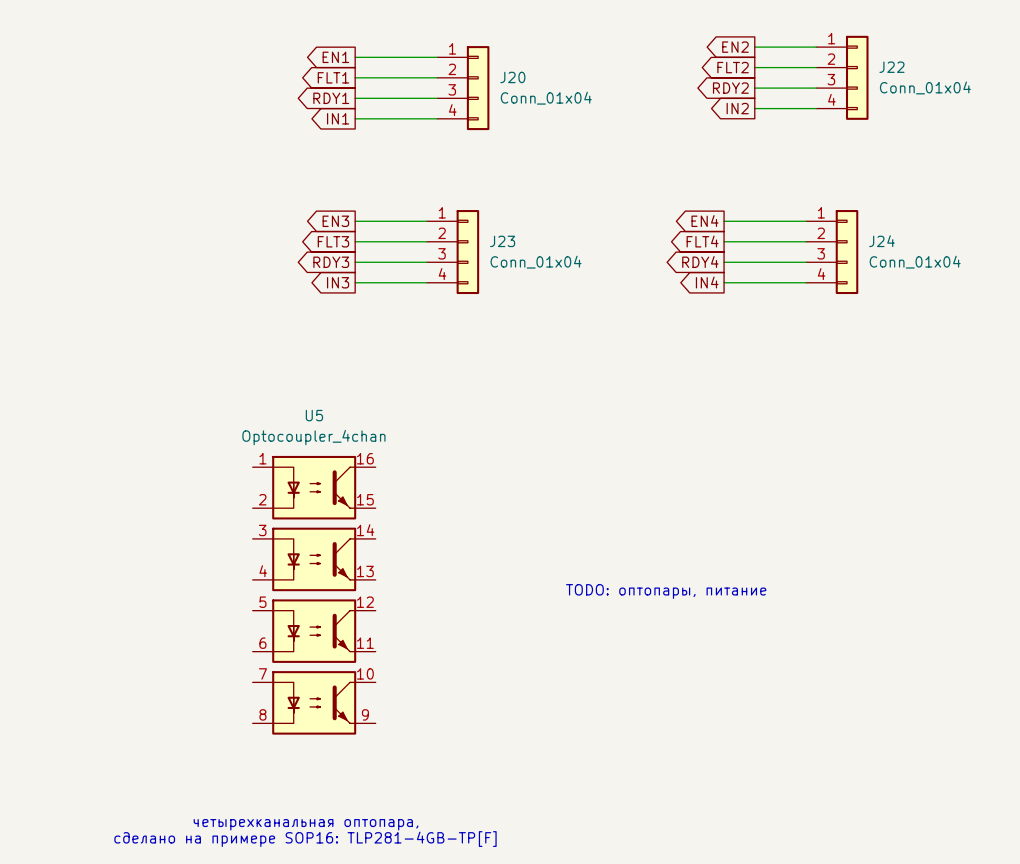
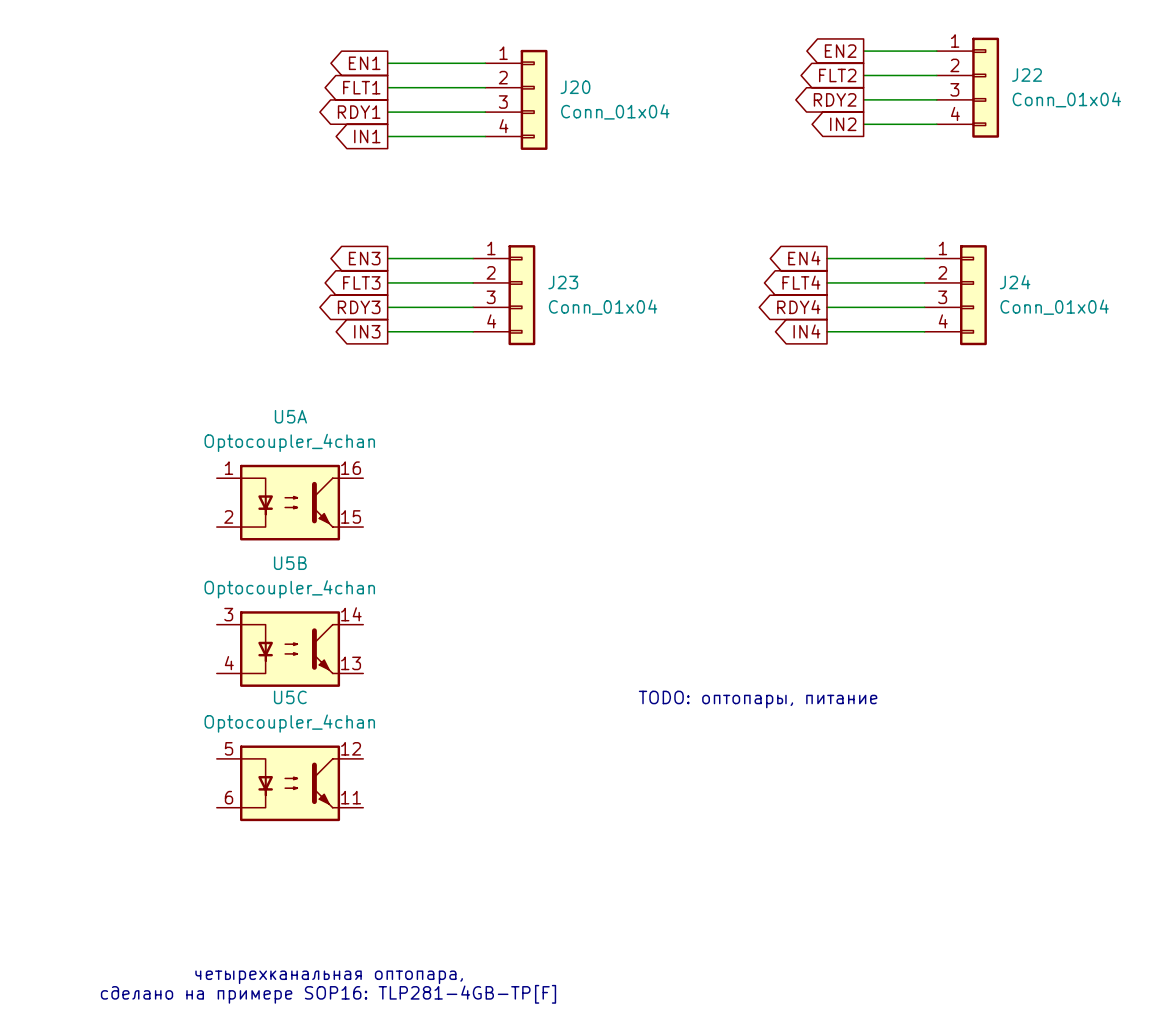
U5A: none -> Optocoupler_4chan (290, 502)
U5B: none -> Optocoupler_4chan (290, 649)
U5: Optocoupler_4chan (314, 595) -> none
U5C: none -> Optocoupler_4chan (290, 783)

